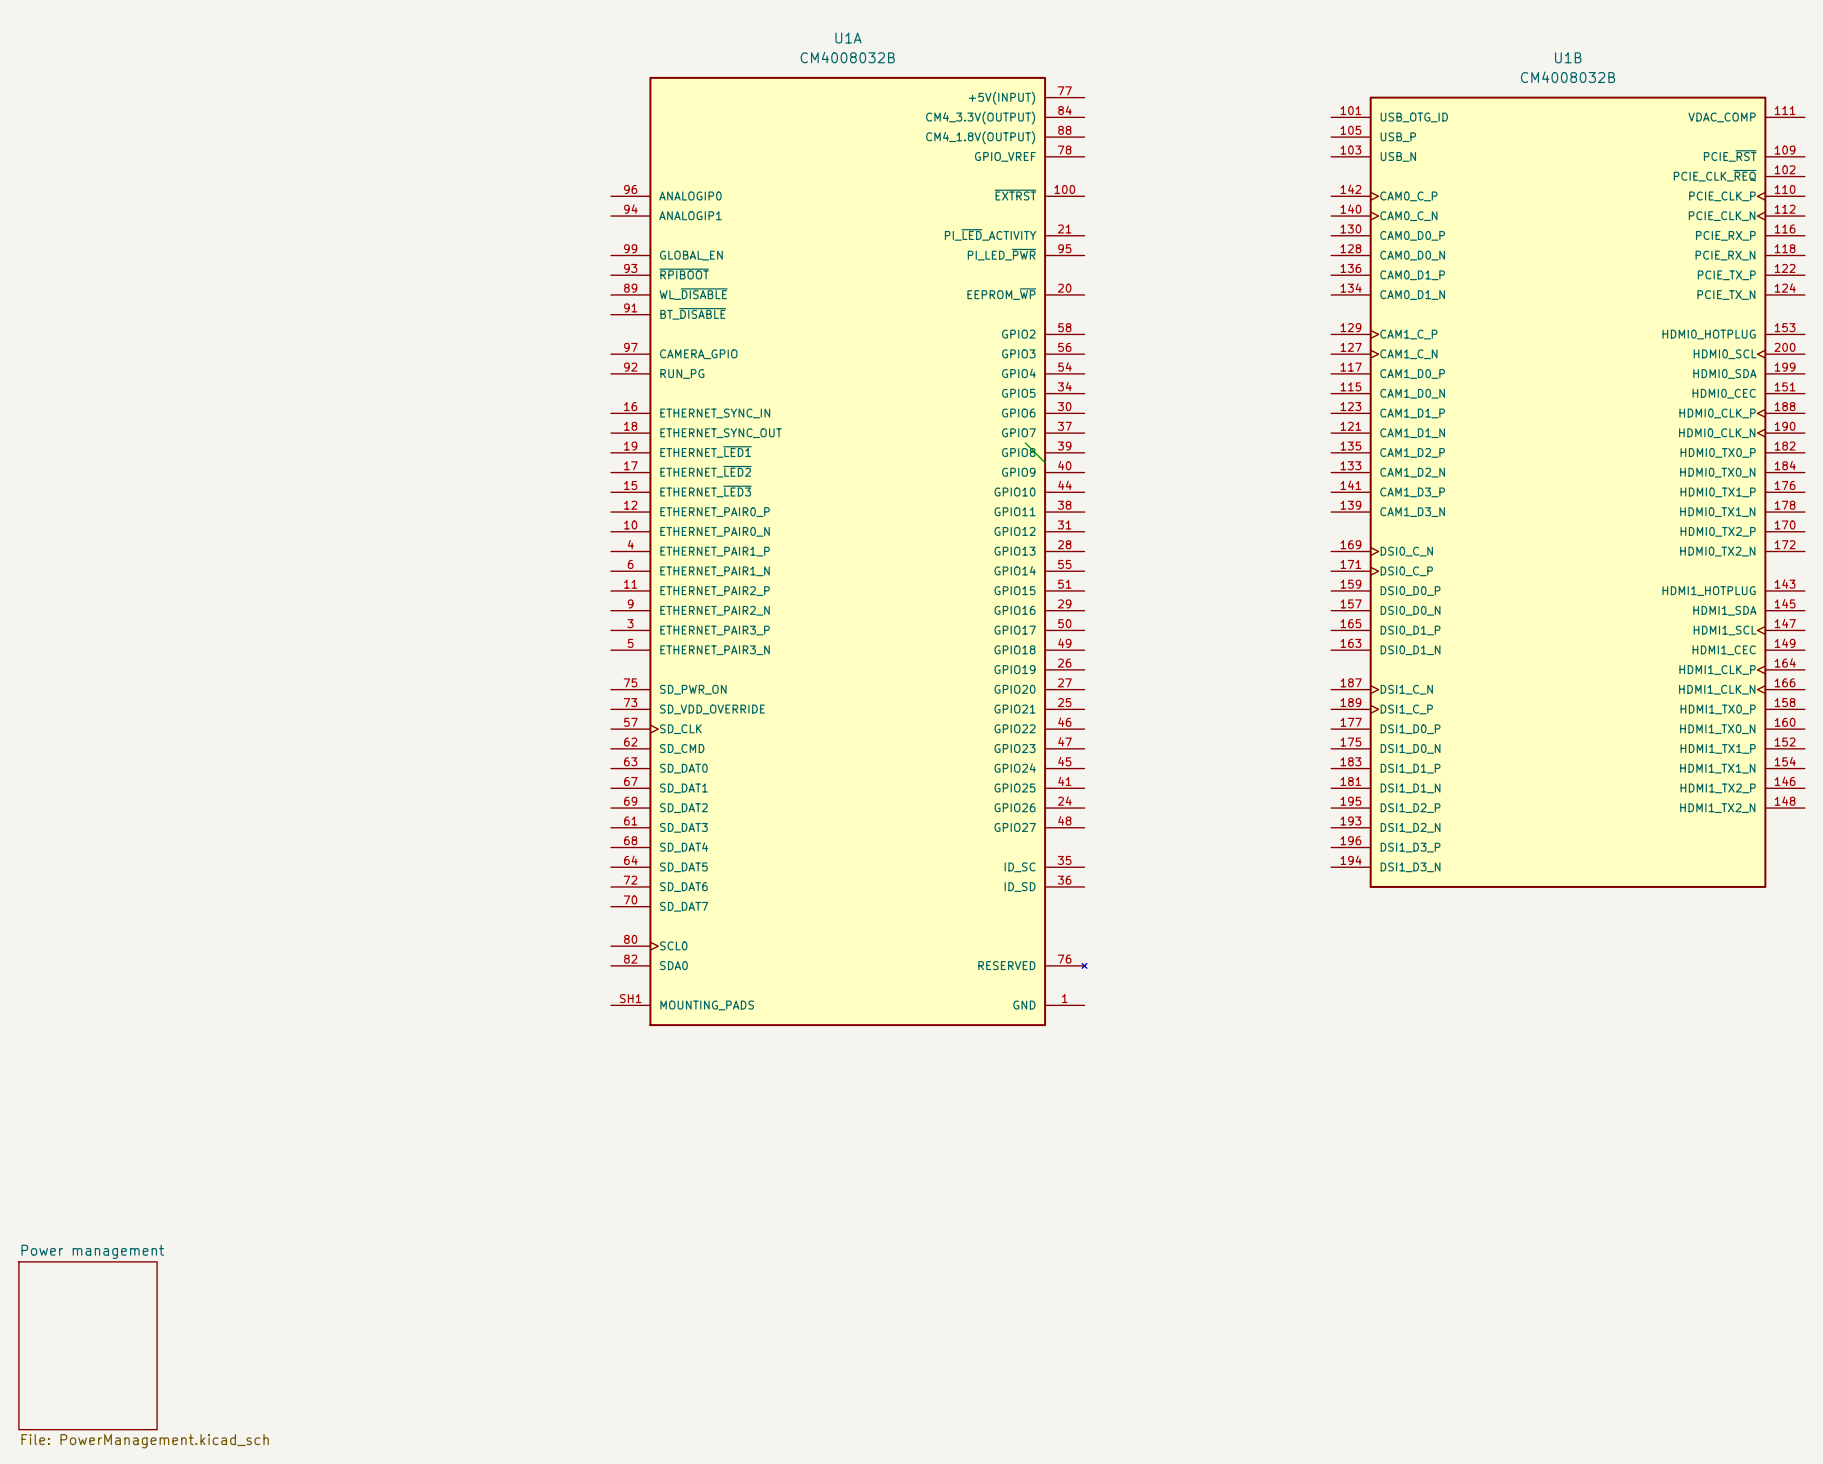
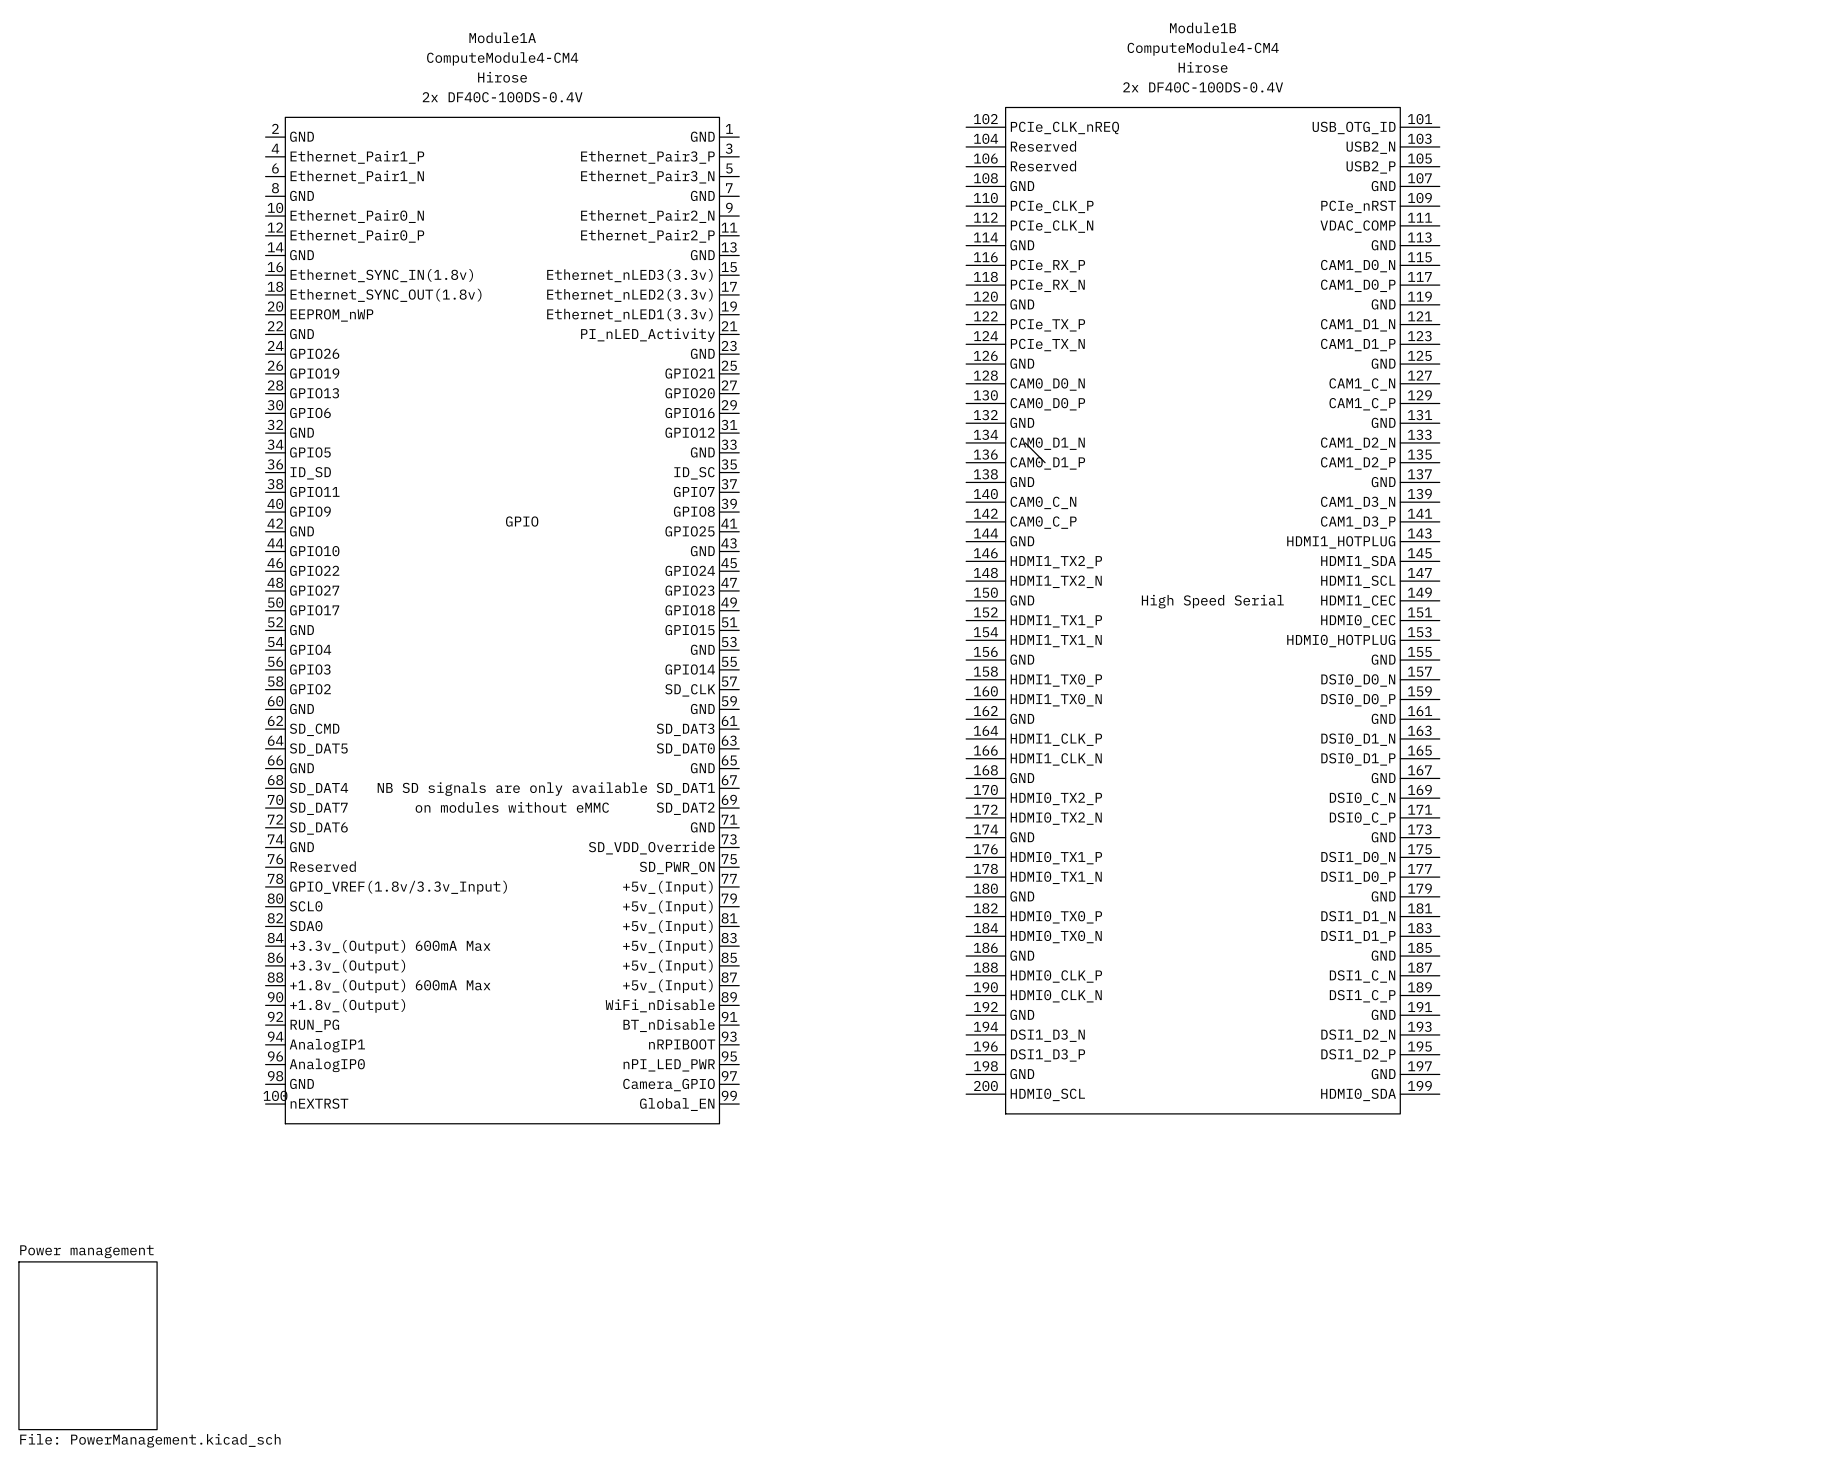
U1B: CM4008032B (1568, 492) -> none
U1A: CM4008032B (848, 551) -> none
Module1B: none -> ComputeModule4-CM4 (1202, 610)
Module1A: none -> ComputeModule4-CM4 (502, 620)

